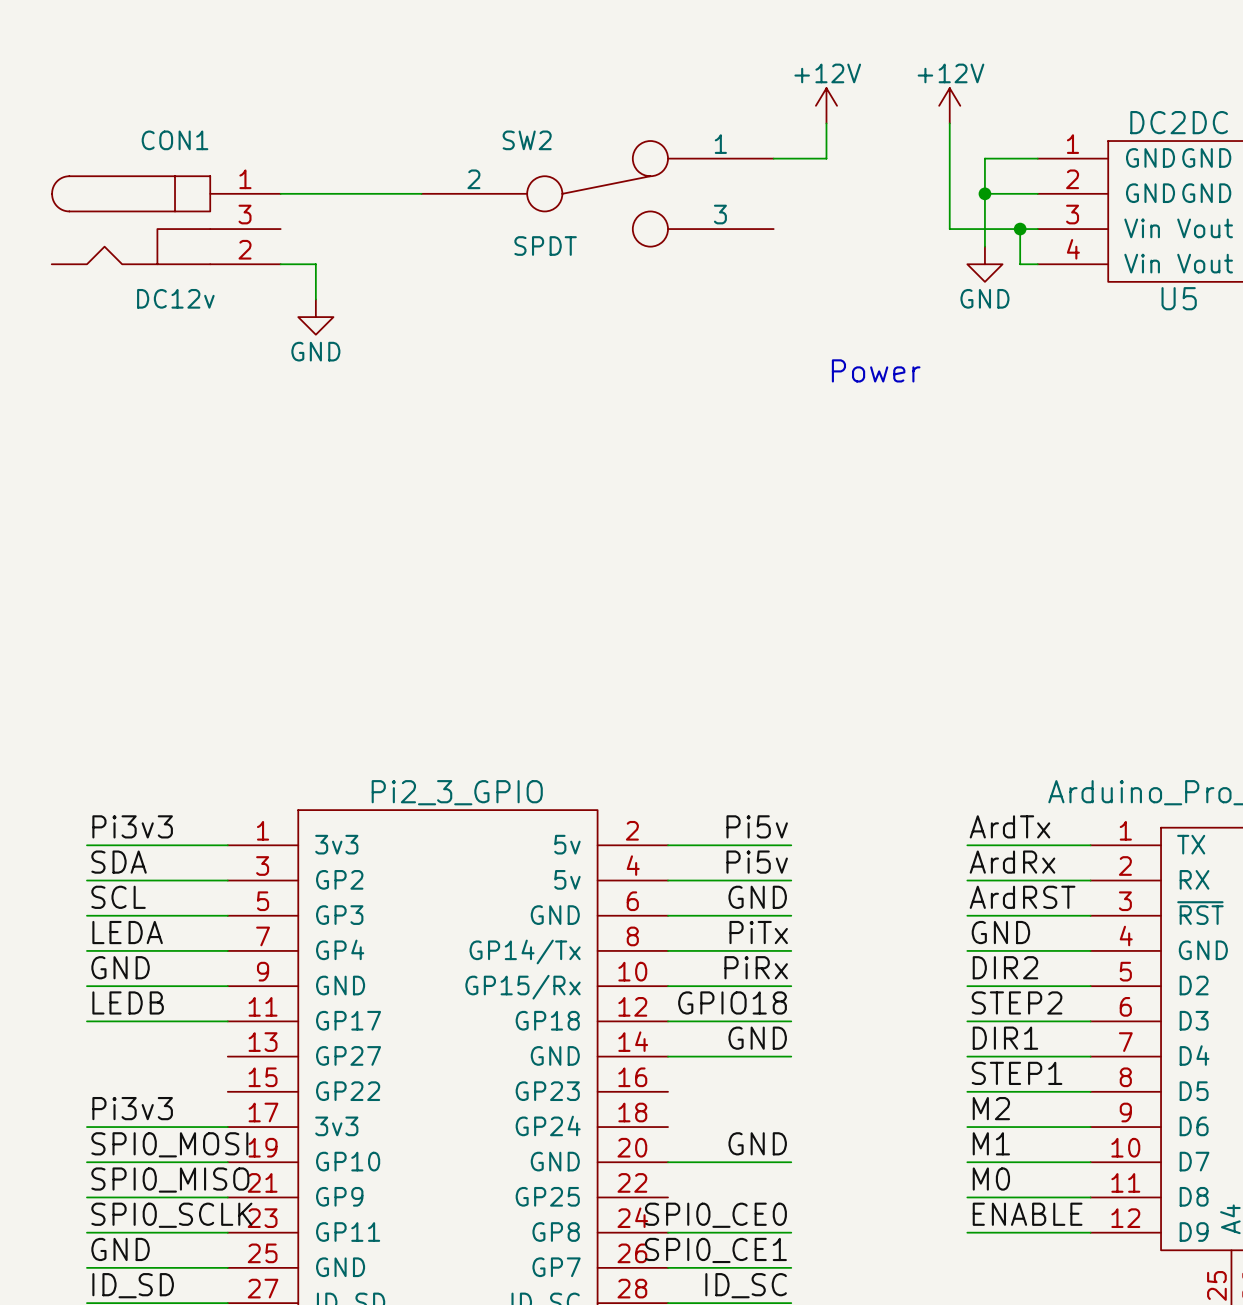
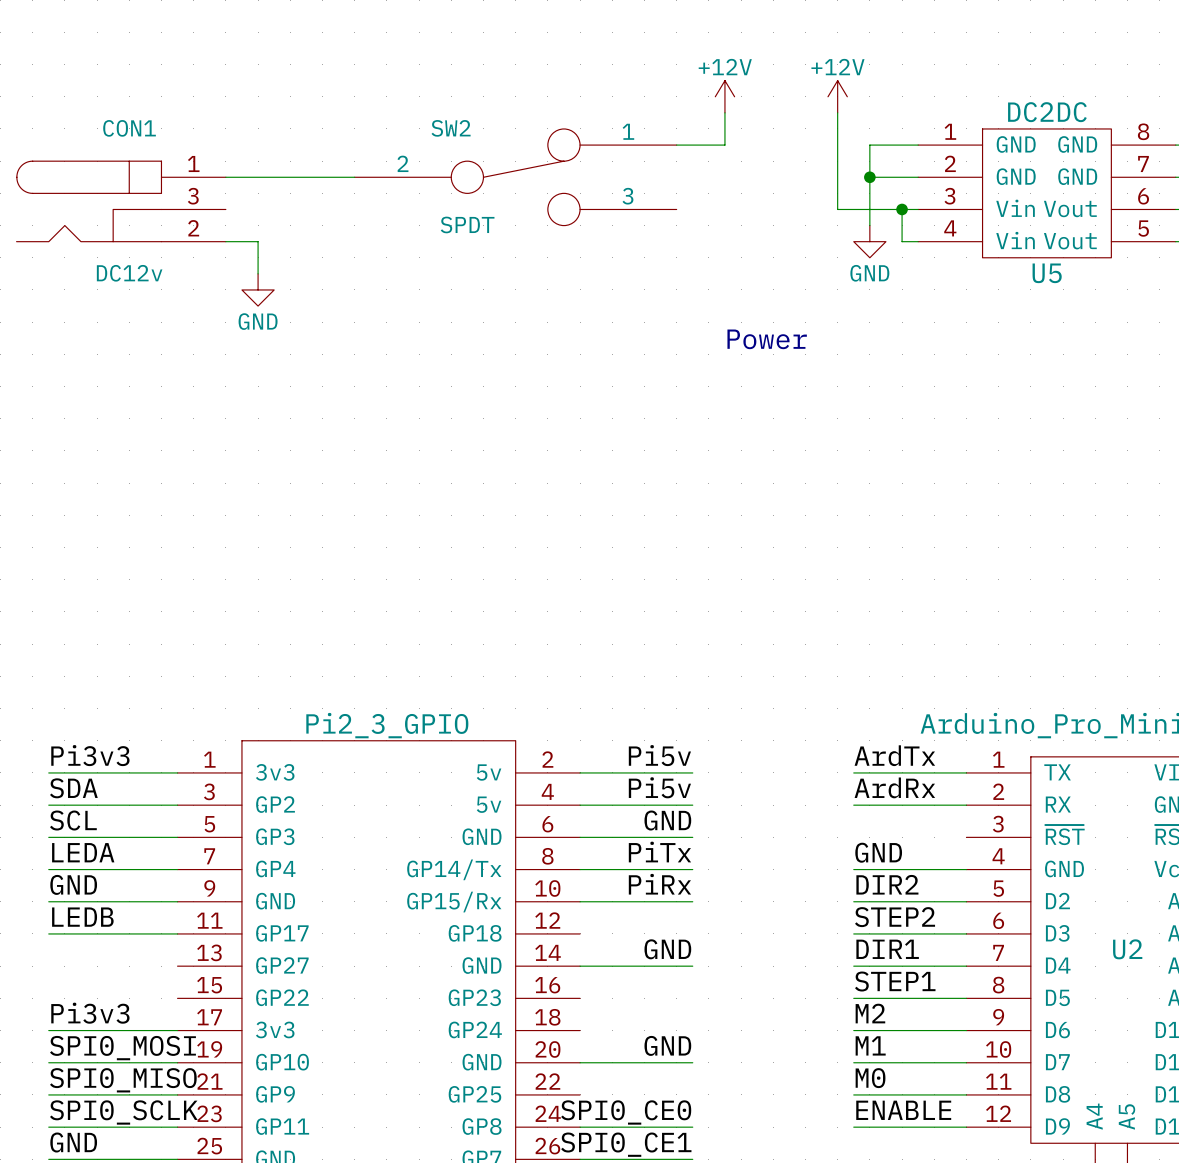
label: ArdRST (1022, 897) -> none
wire: (967, 915) (1090, 915) -> none
label: GPIO18 (732, 1002) -> none
wire: (668, 1021) (791, 1021) -> none

